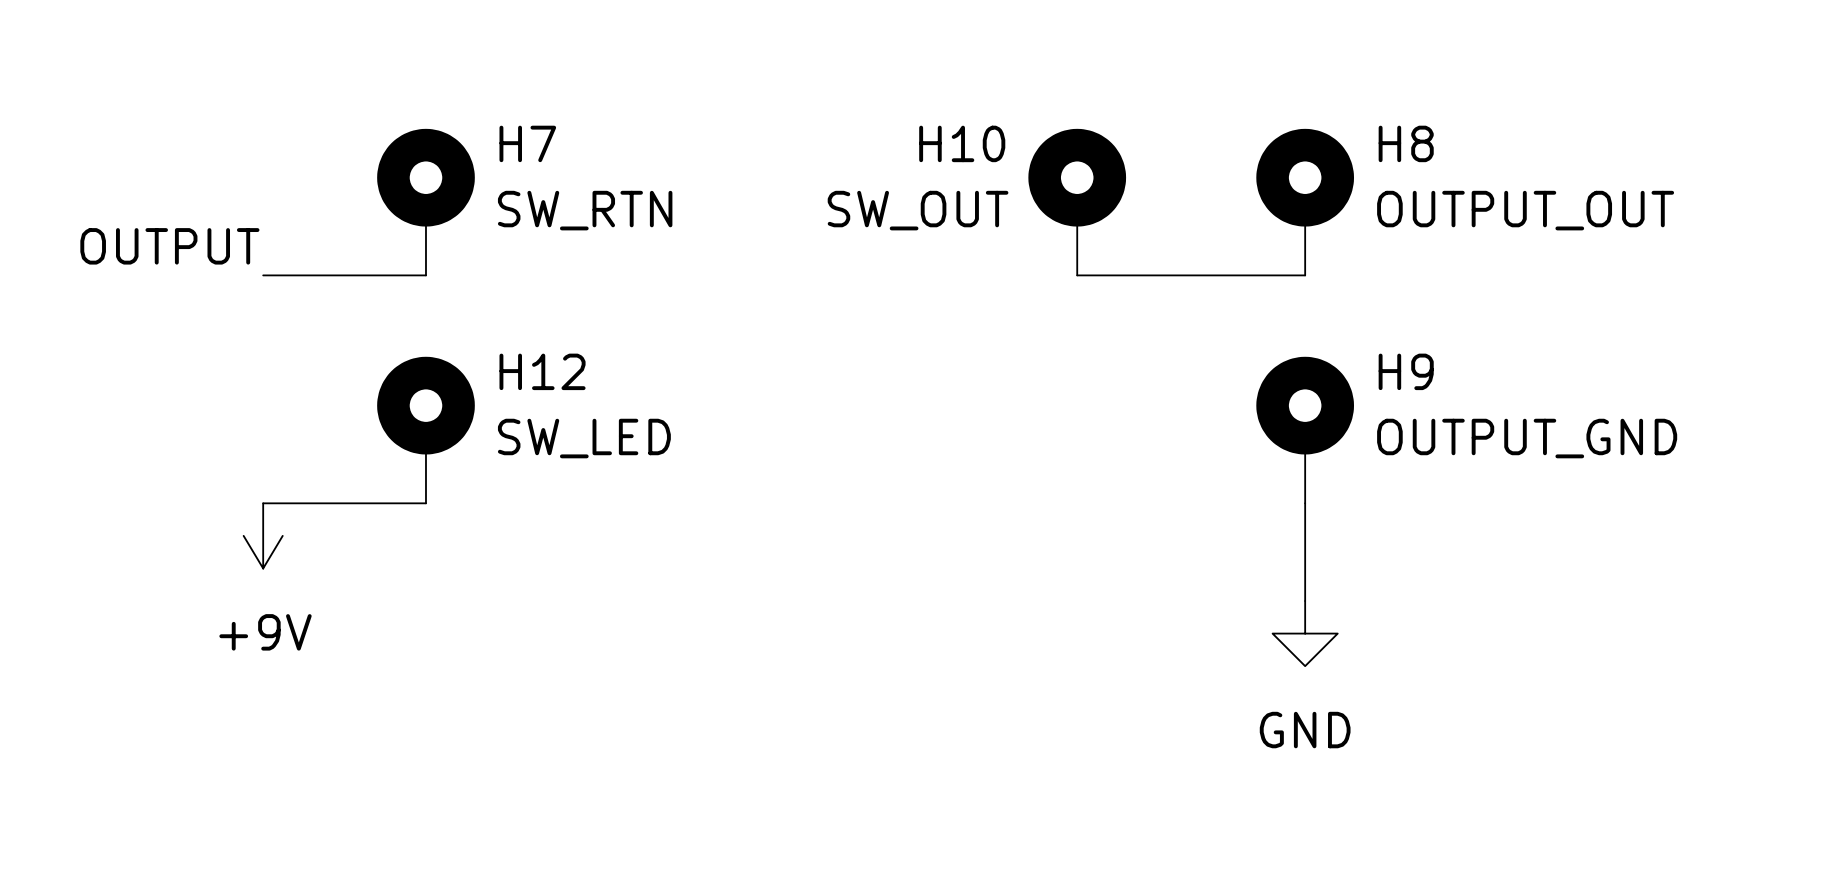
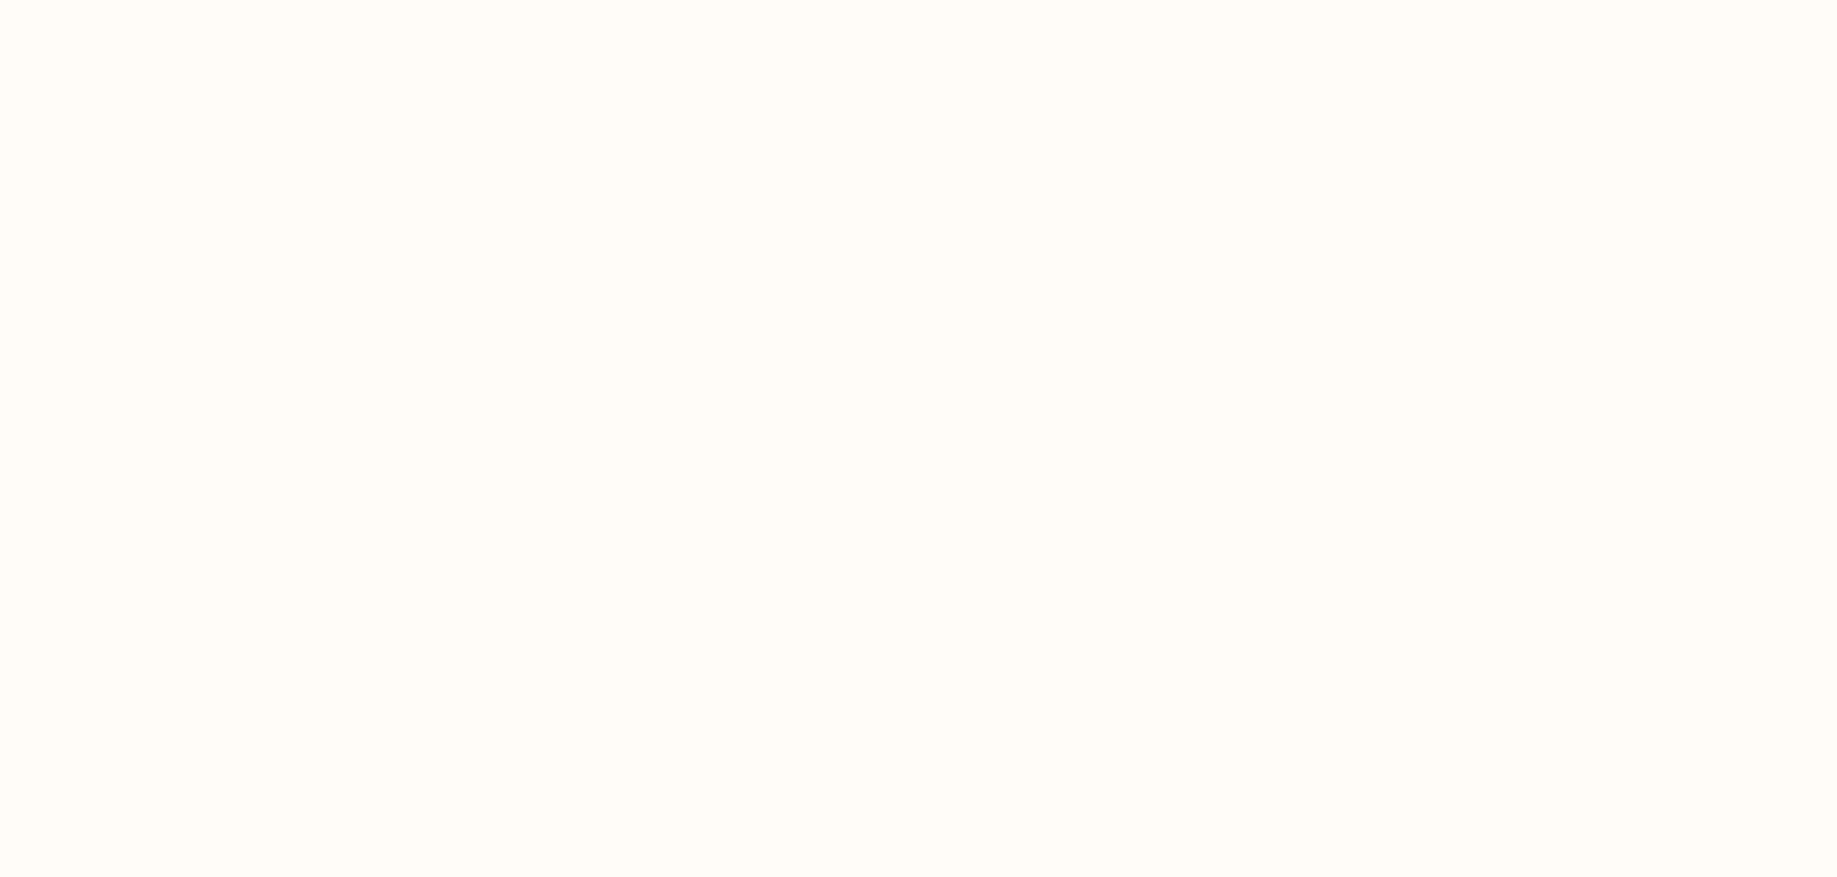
H7: SW_RTN (425, 202) -> none
H10: SW_OUT (1077, 202) -> none
H8: OUTPUT_OUT (1305, 202) -> none
label: OUTPUT (169, 246) -> none
wire: (263, 275) (425, 275) -> none
wire: (1077, 275) (1305, 275) -> none
H12: SW_LED (425, 430) -> none
H9: OUTPUT_GND (1305, 430) -> none
wire: (263, 503) (425, 503) -> none
wire: (1305, 503) (1305, 601) -> none
power symbol: +9V (263, 535) -> none
power symbol: GND (1305, 633) -> none

